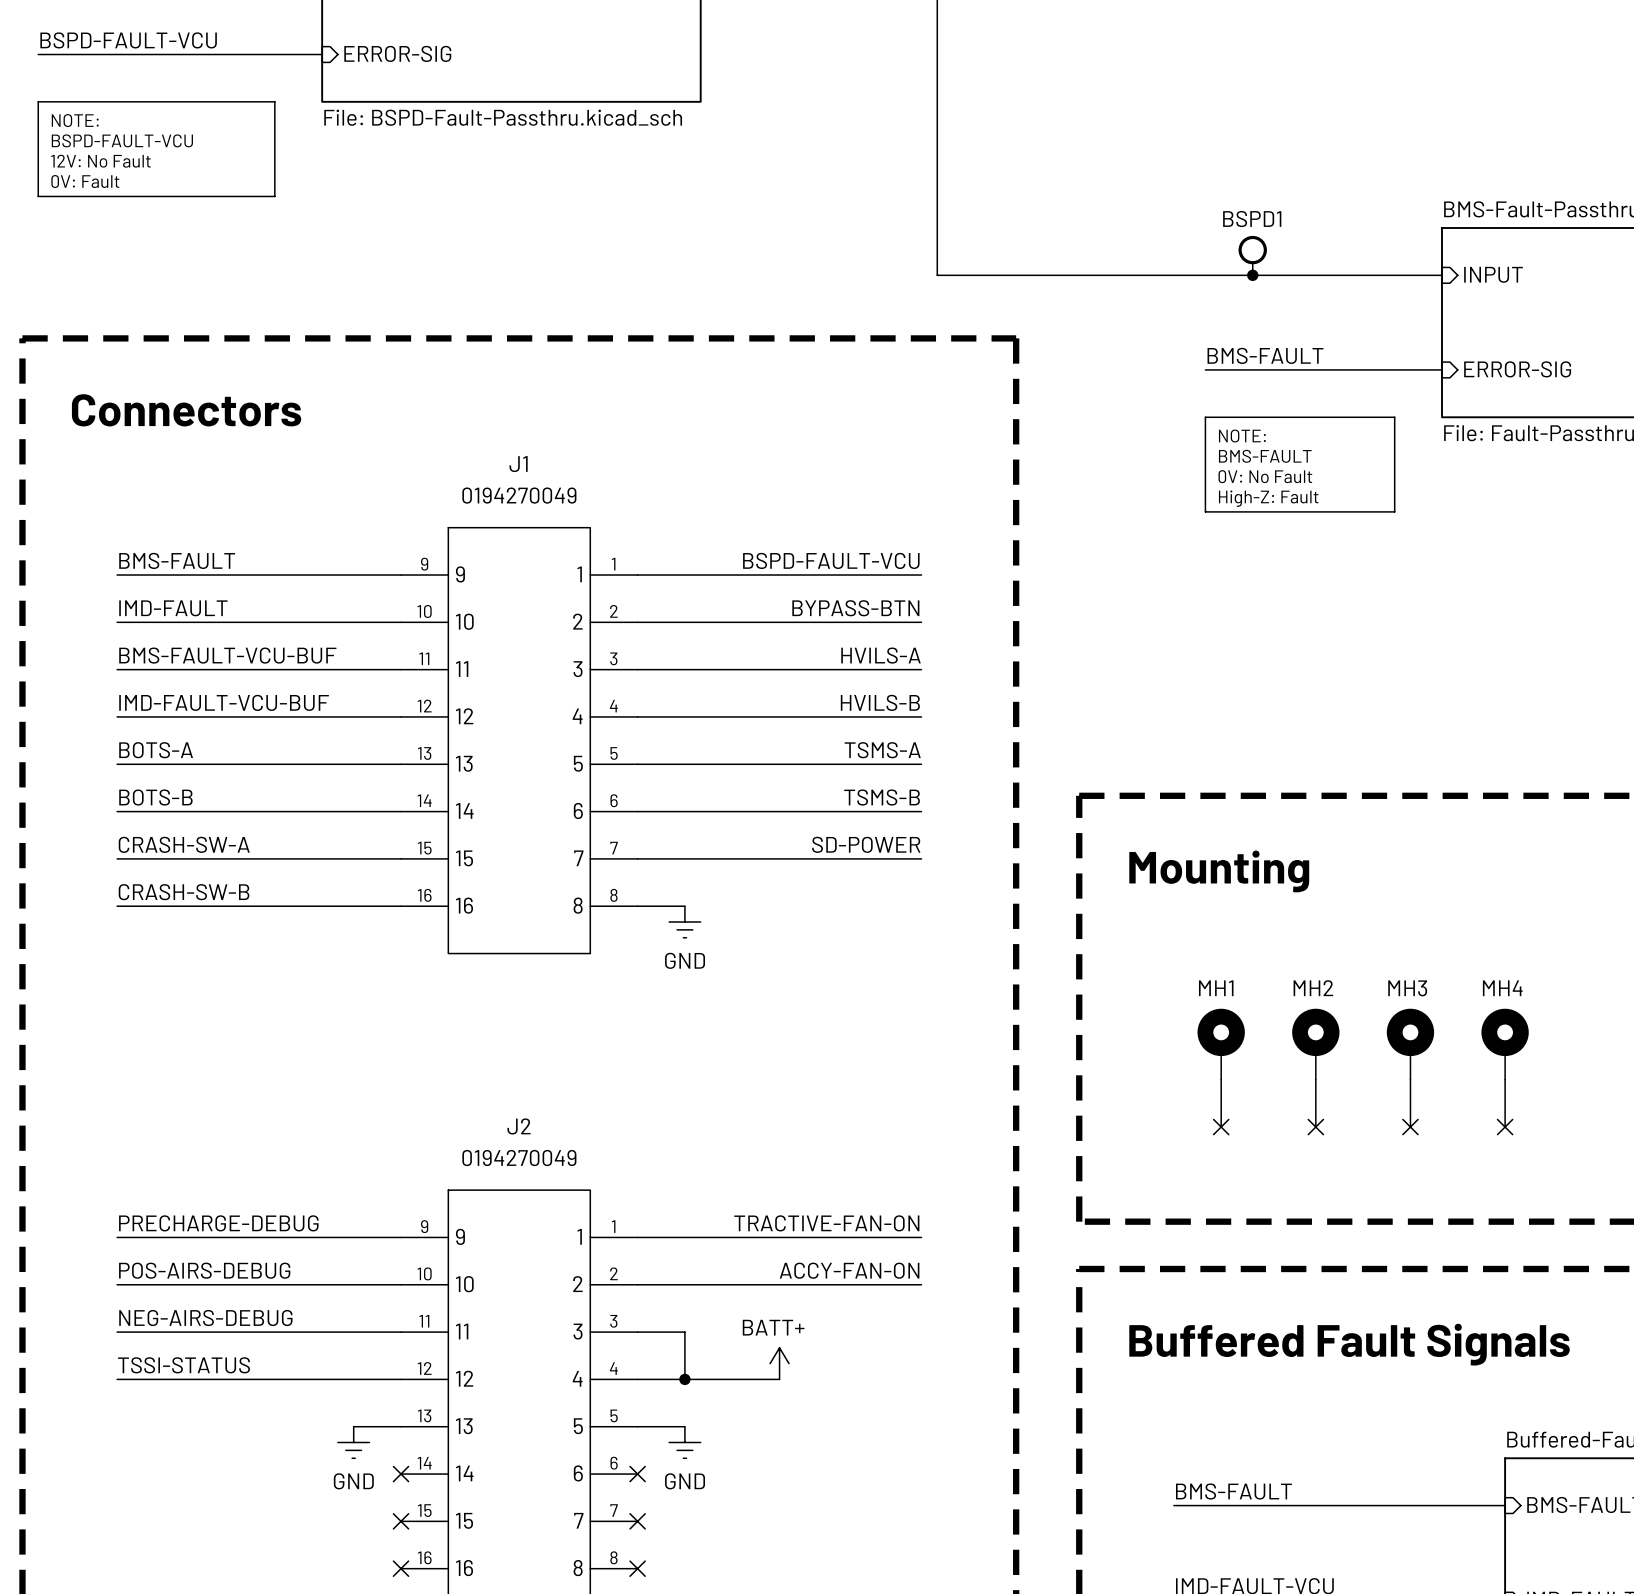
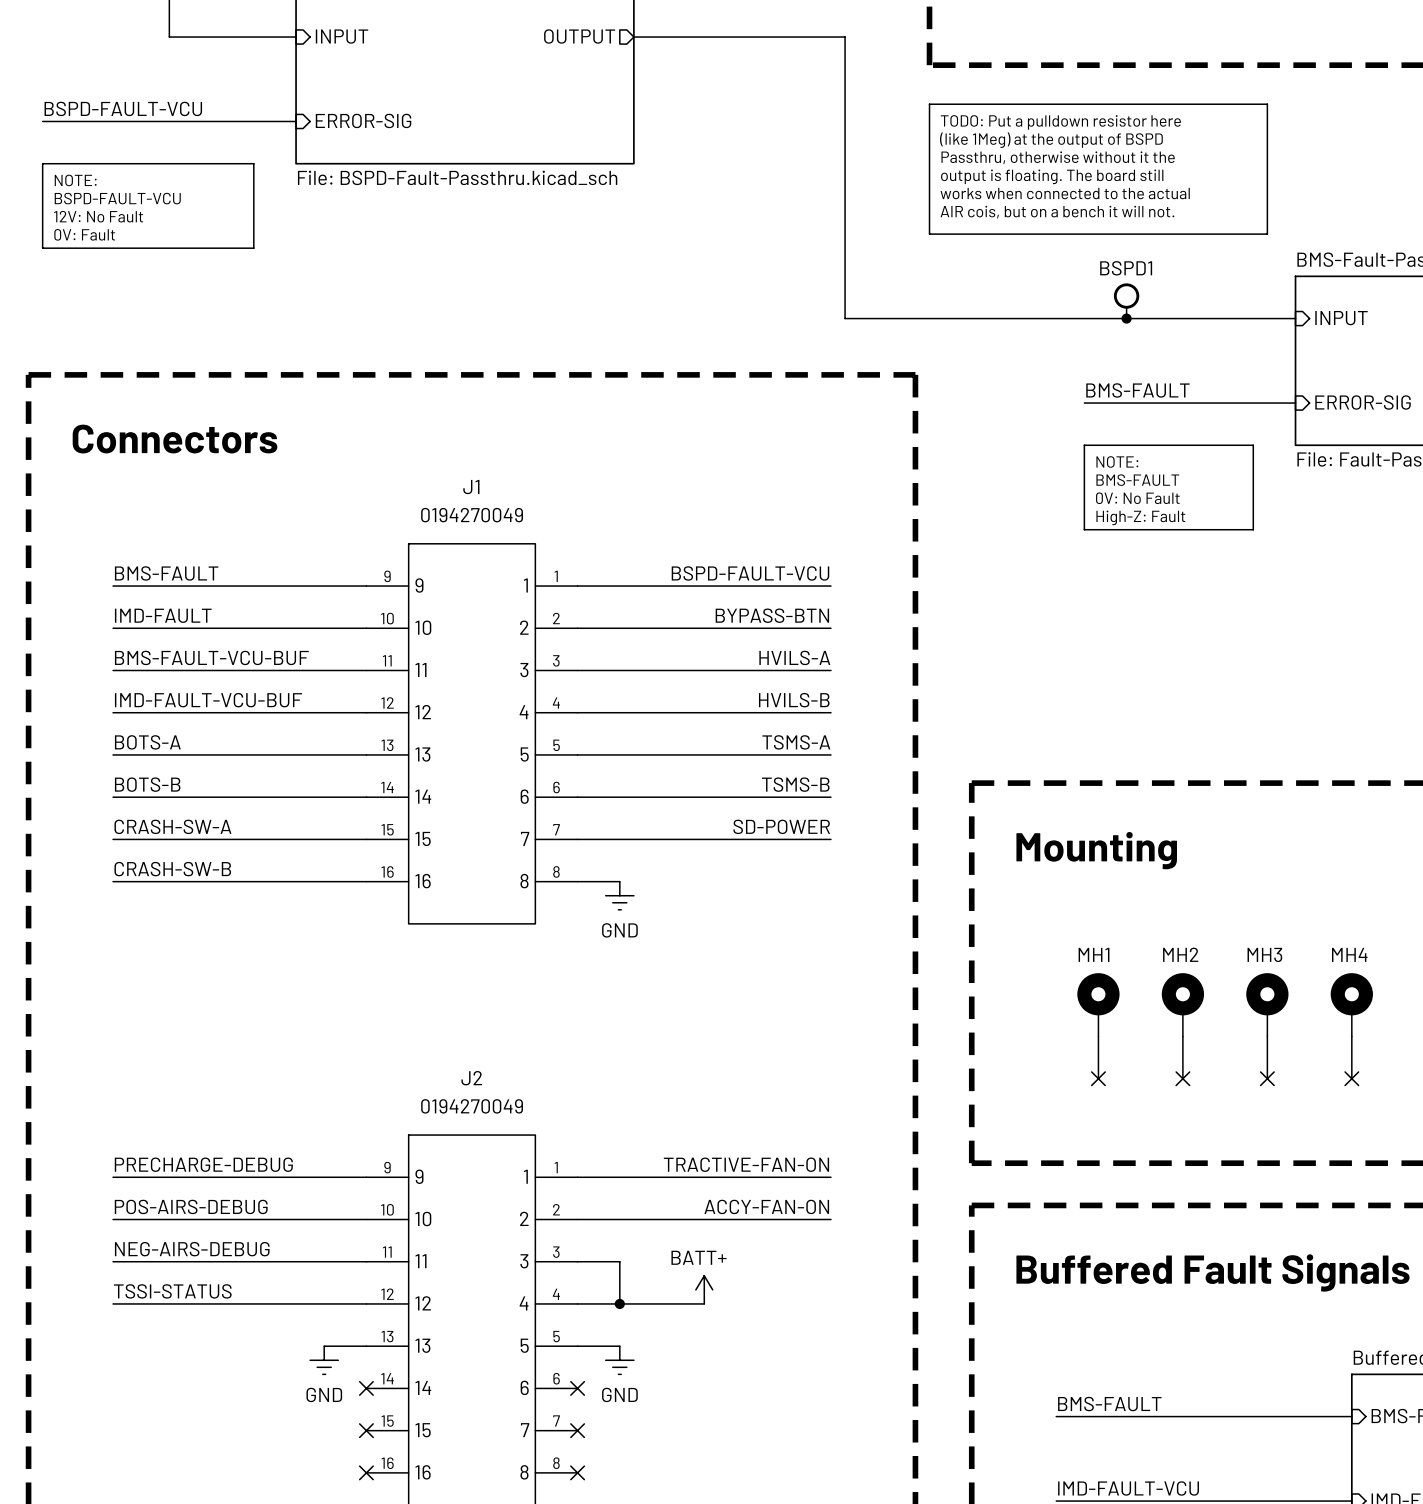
line: none -> (929, 104) (1267, 104) (1267, 234) (929, 234) (929, 104)
text: none -> TODO: Put a pulldown resistor here (1060, 122)
text: none -> (like 1Meg) at the output of BSPD (1051, 140)
text: none -> Passthru, otherwise without it the (1058, 157)
text: none -> output is floating. The board still (1052, 176)
text: none -> works when connected to the actual (1065, 193)
text: none -> AIR cois, but on a bench it will not. (1057, 212)

